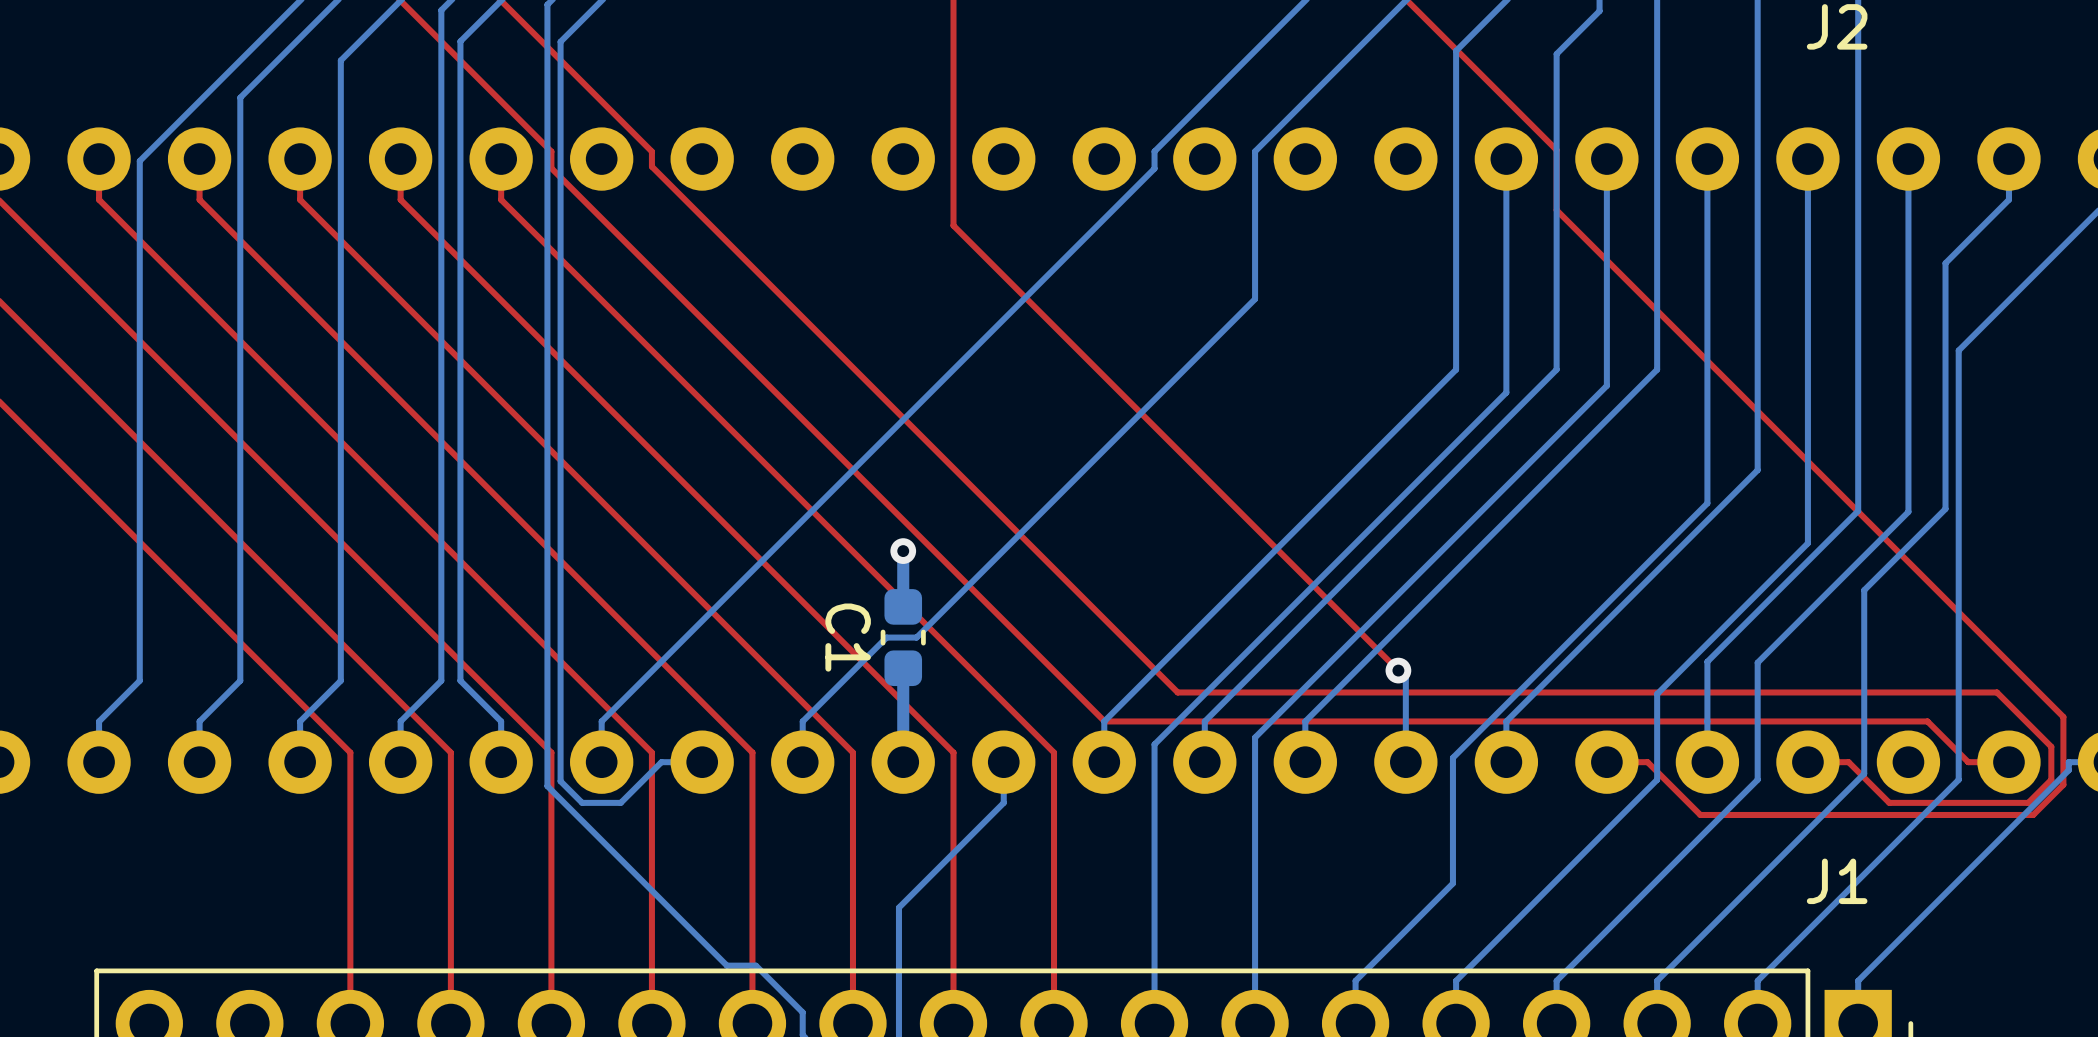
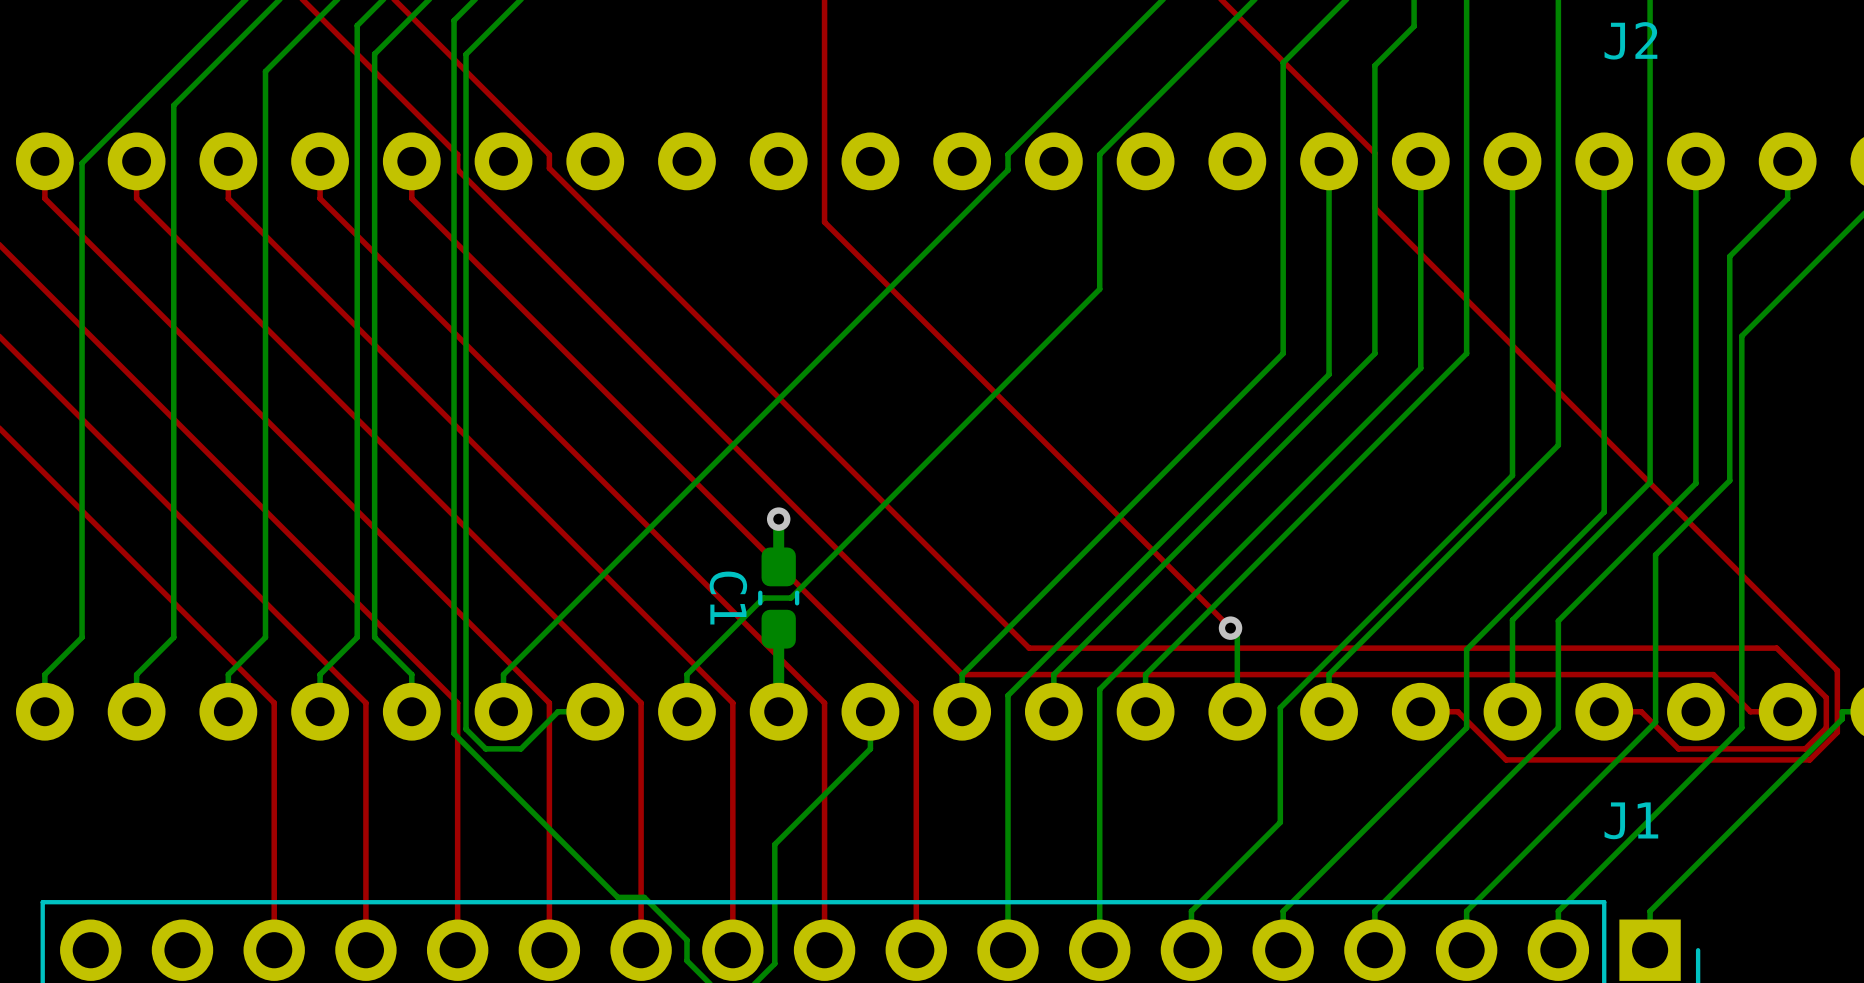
C1 footprint: [880, 589, 926, 687] -> [758, 547, 800, 649]

